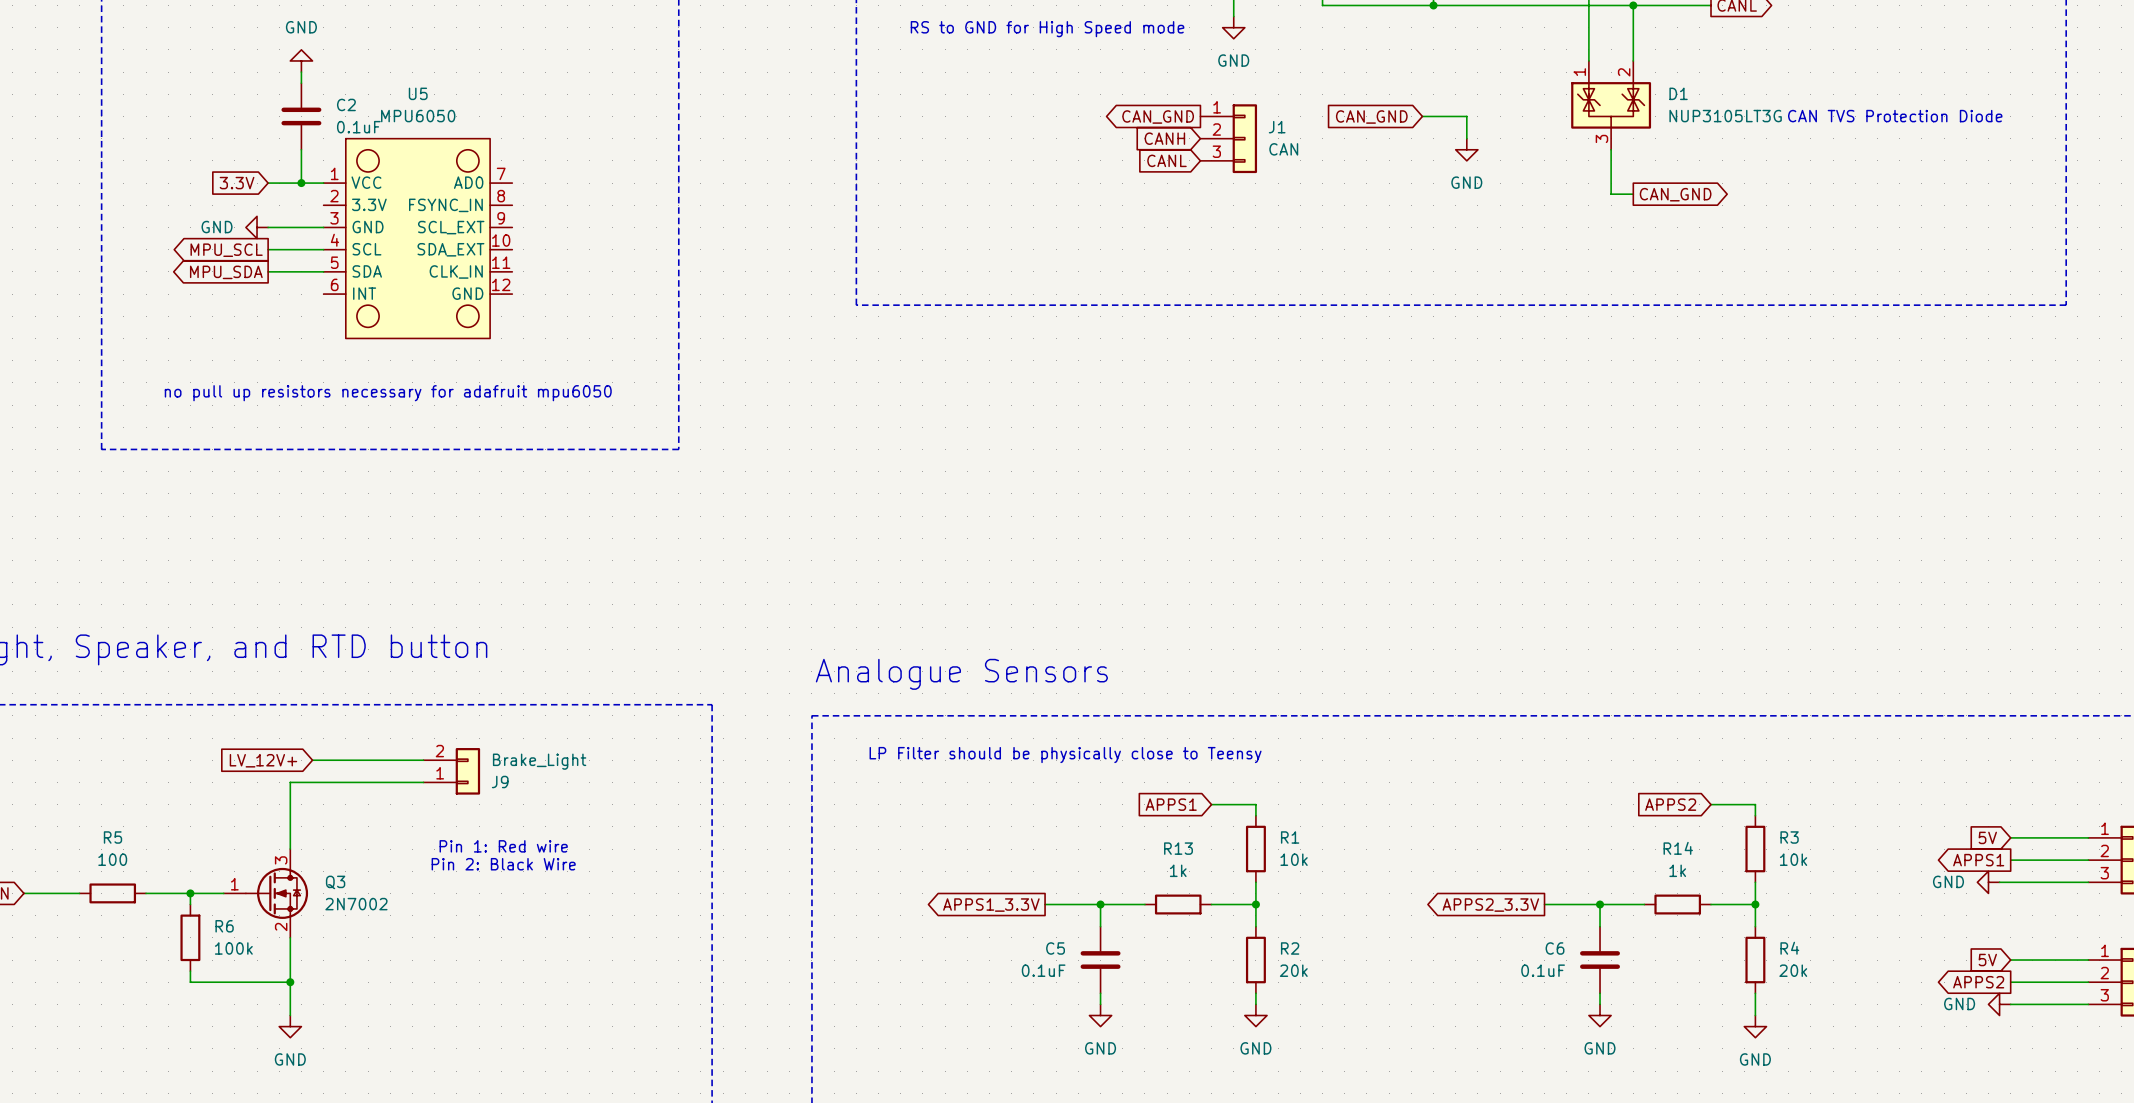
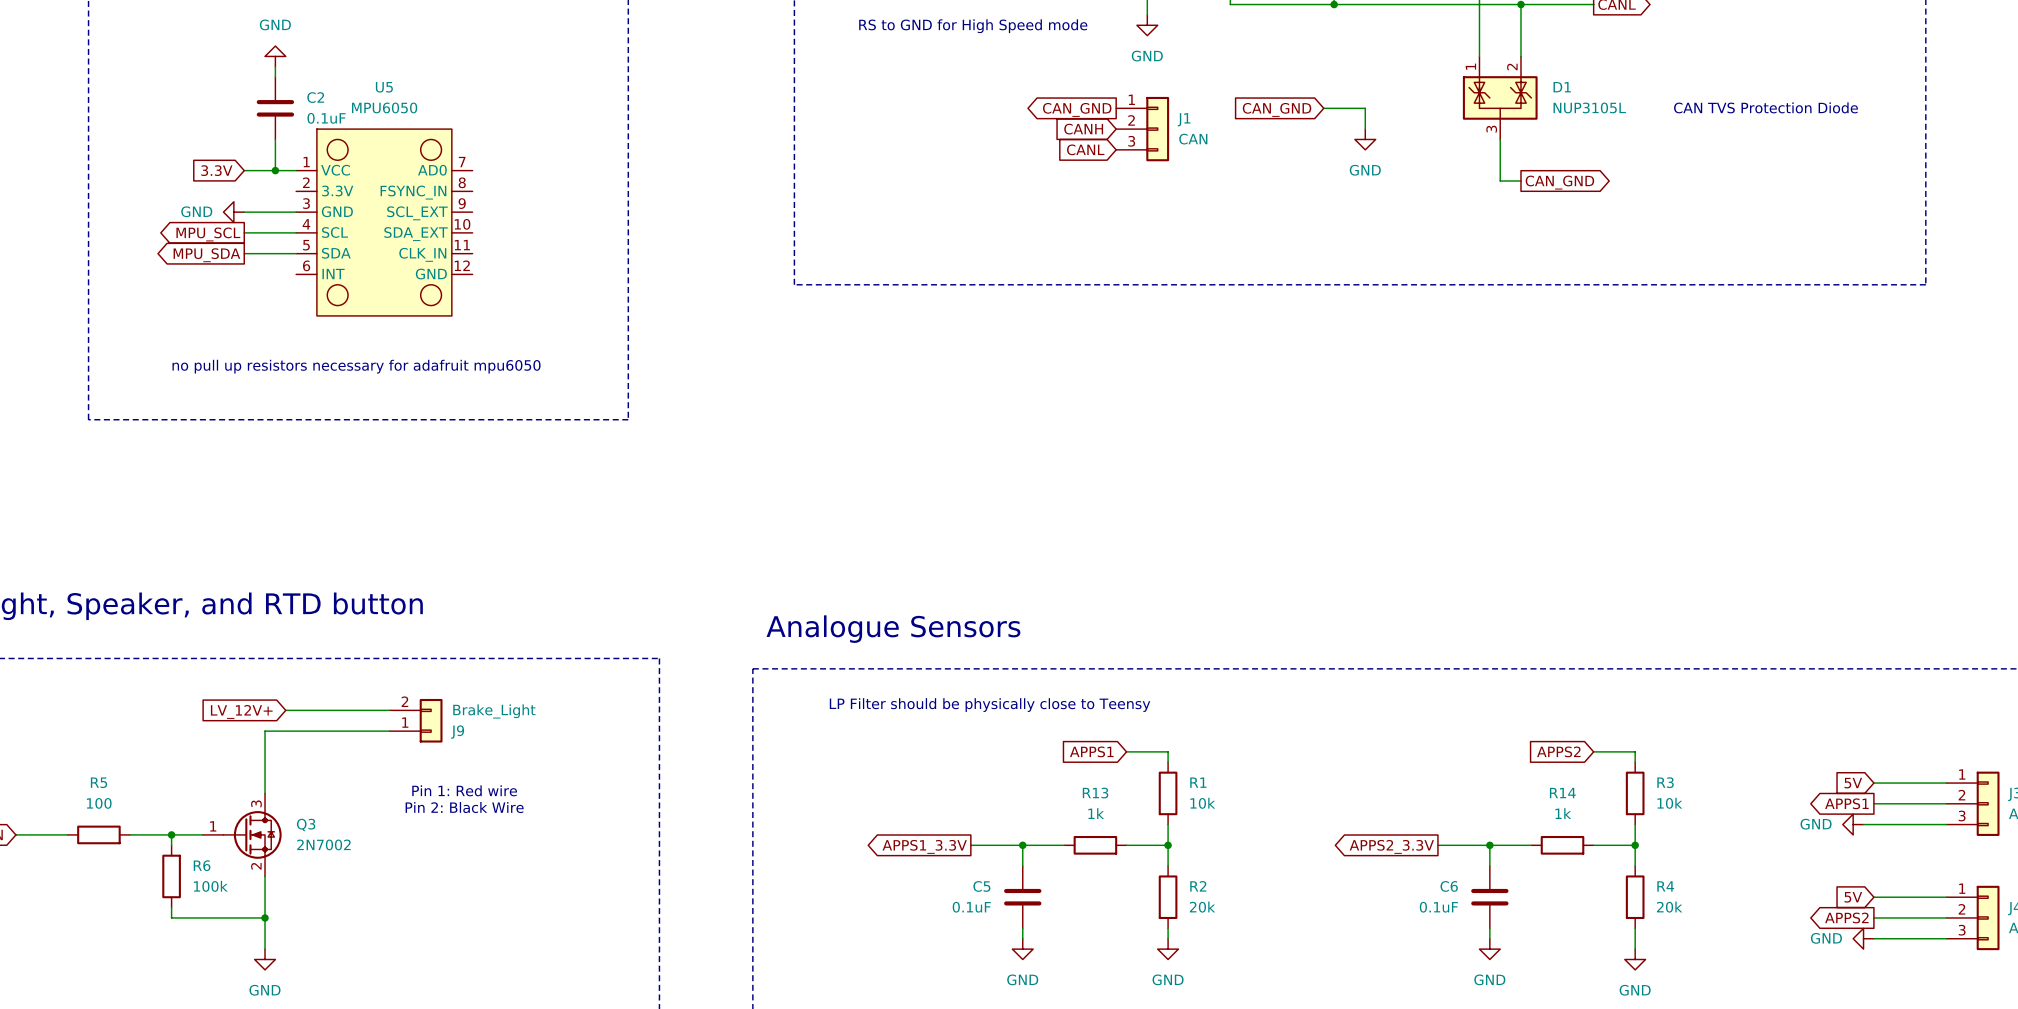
D1 value: NUP3105LT3G (1725, 116) -> NUP3105L (1589, 107)

